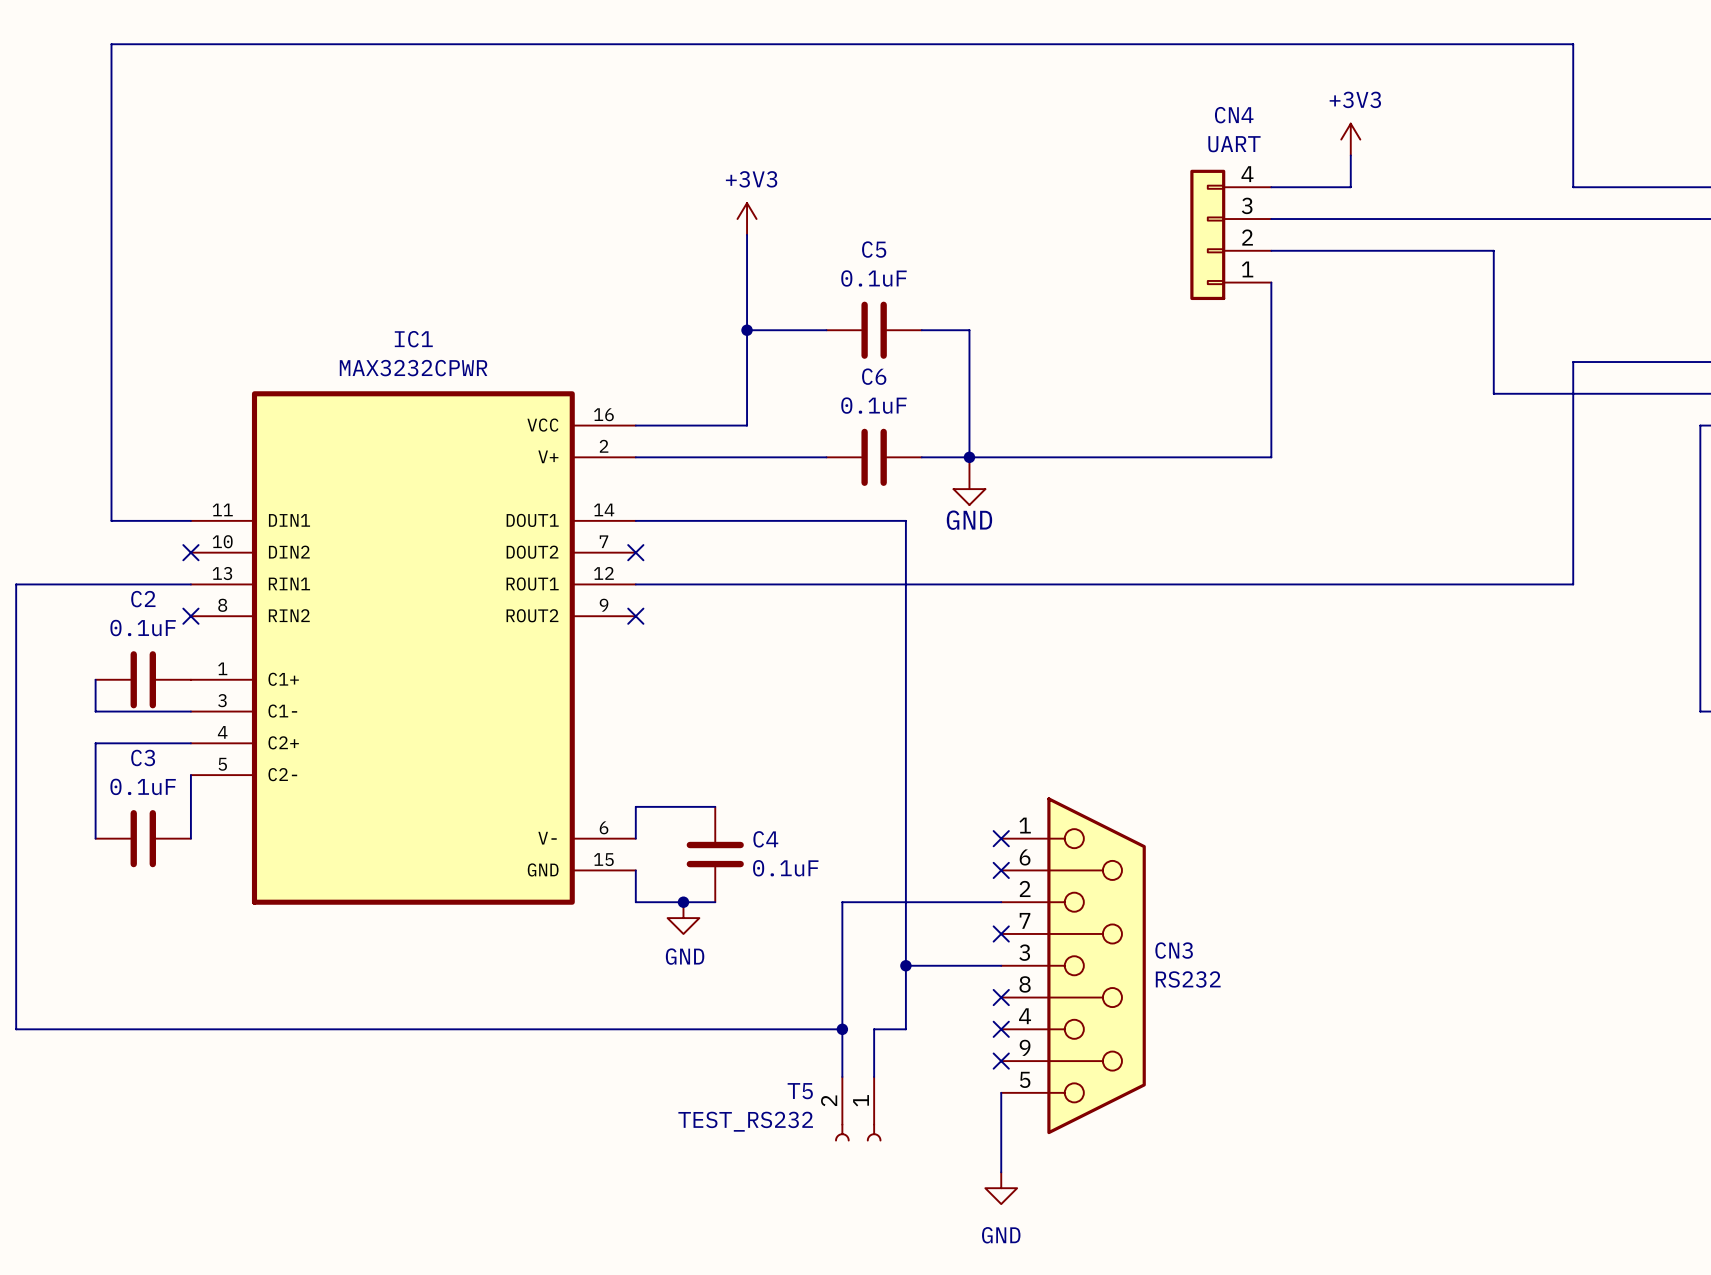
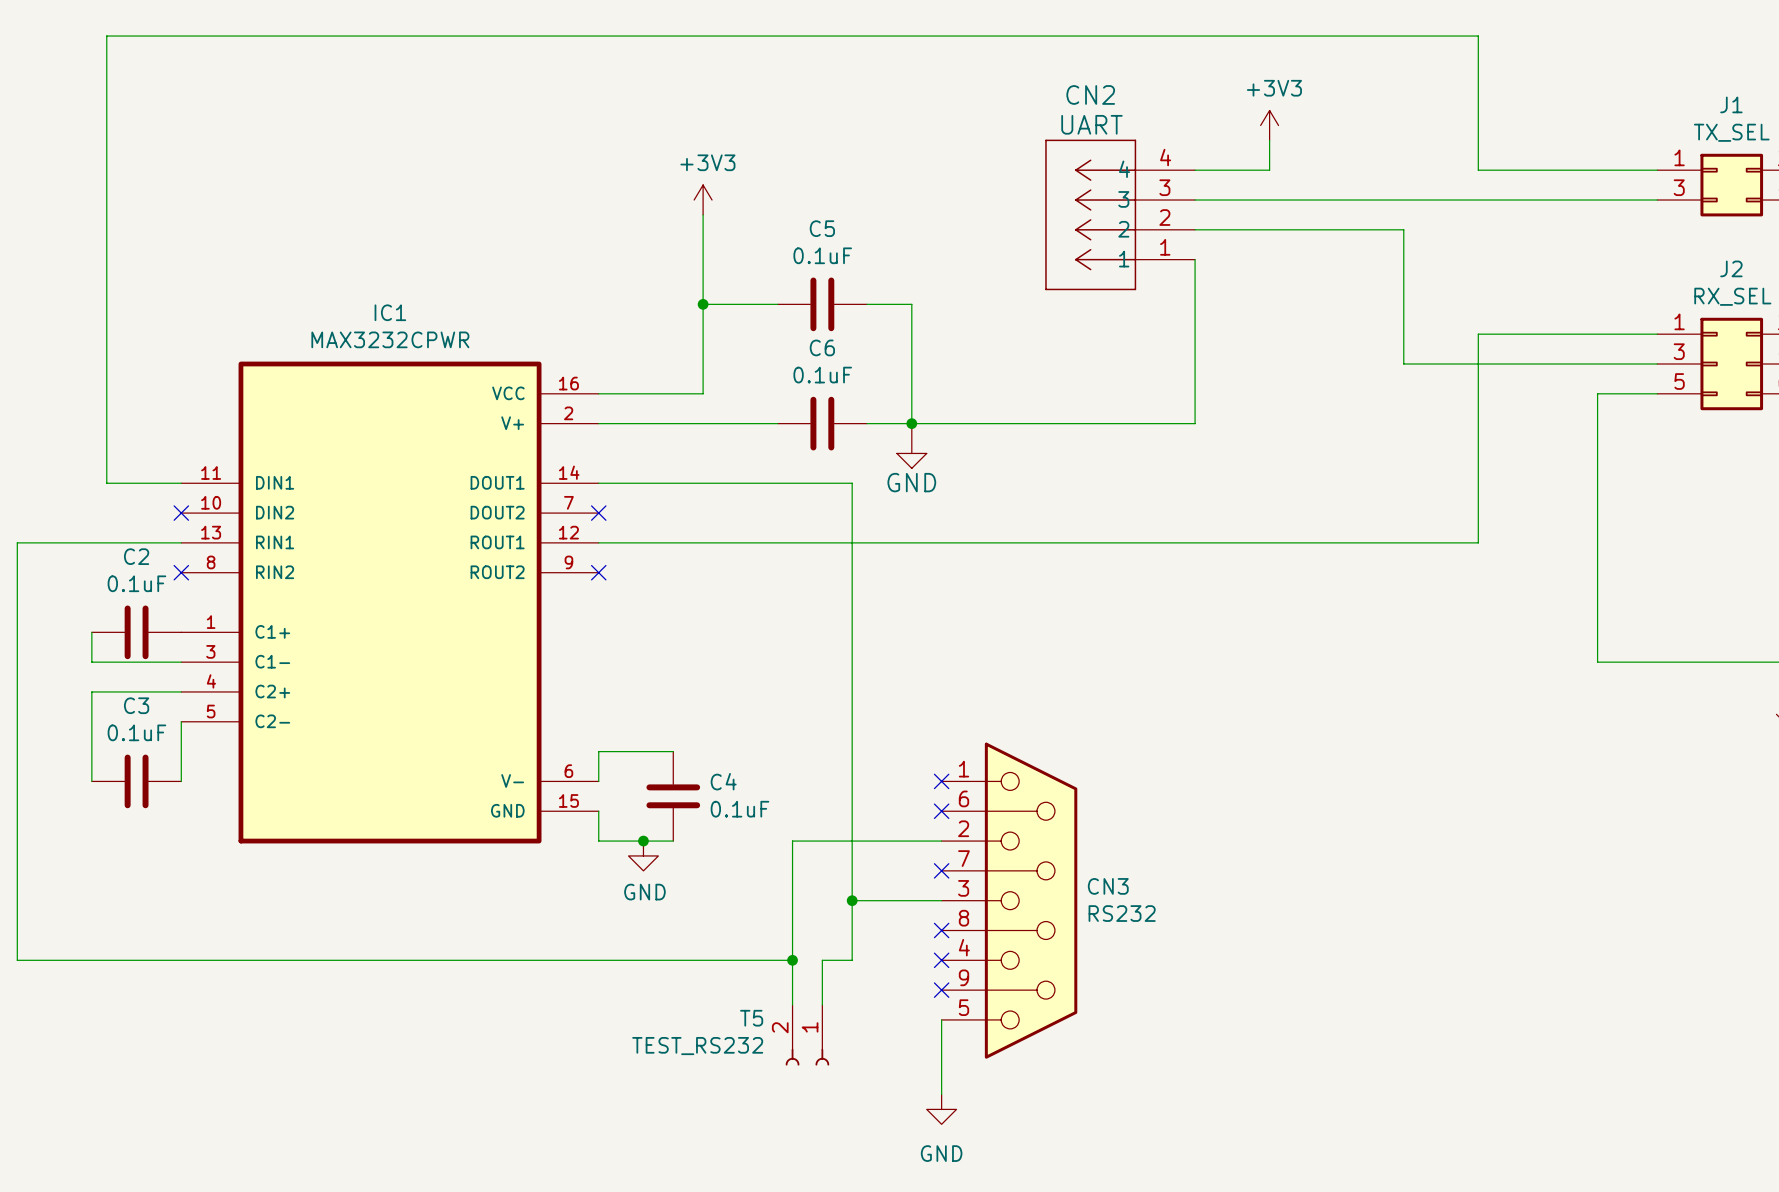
CN2: none -> UART (1120, 214)
CN4: UART (1230, 234) -> none

